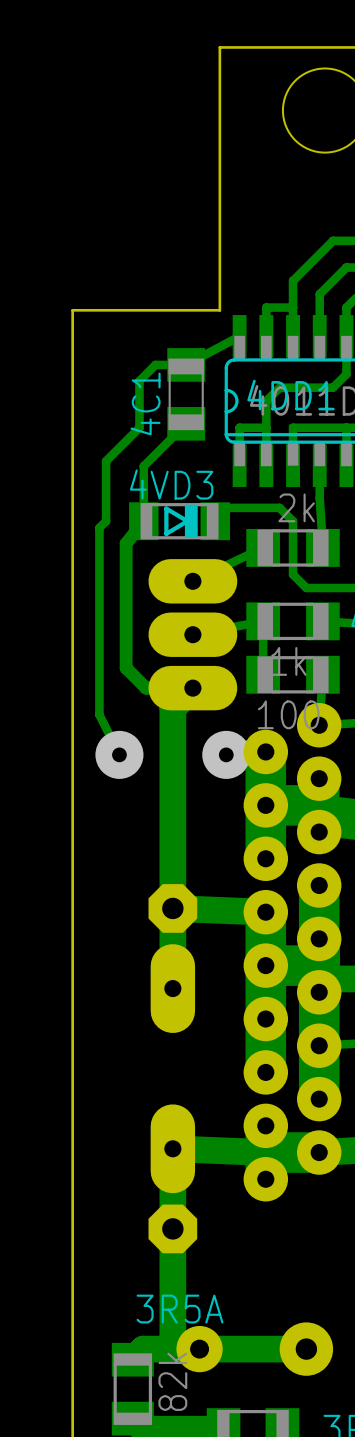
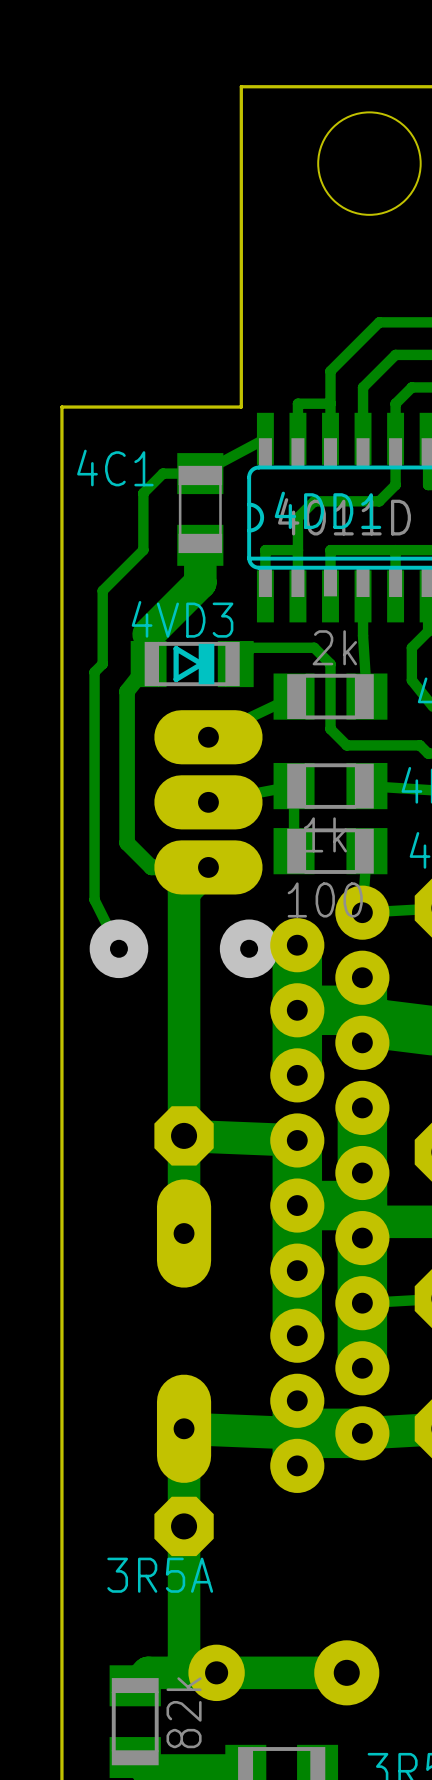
4C1 name rotation: 0° (145, 403) -> 90° clockwise (115, 468)
track: (186, 423) (143, 466) (143, 496) -> (200, 545) (200, 582) (148, 634)
3R5A name position: 3R5A (179, 1309) -> 3R5A (160, 1575)

